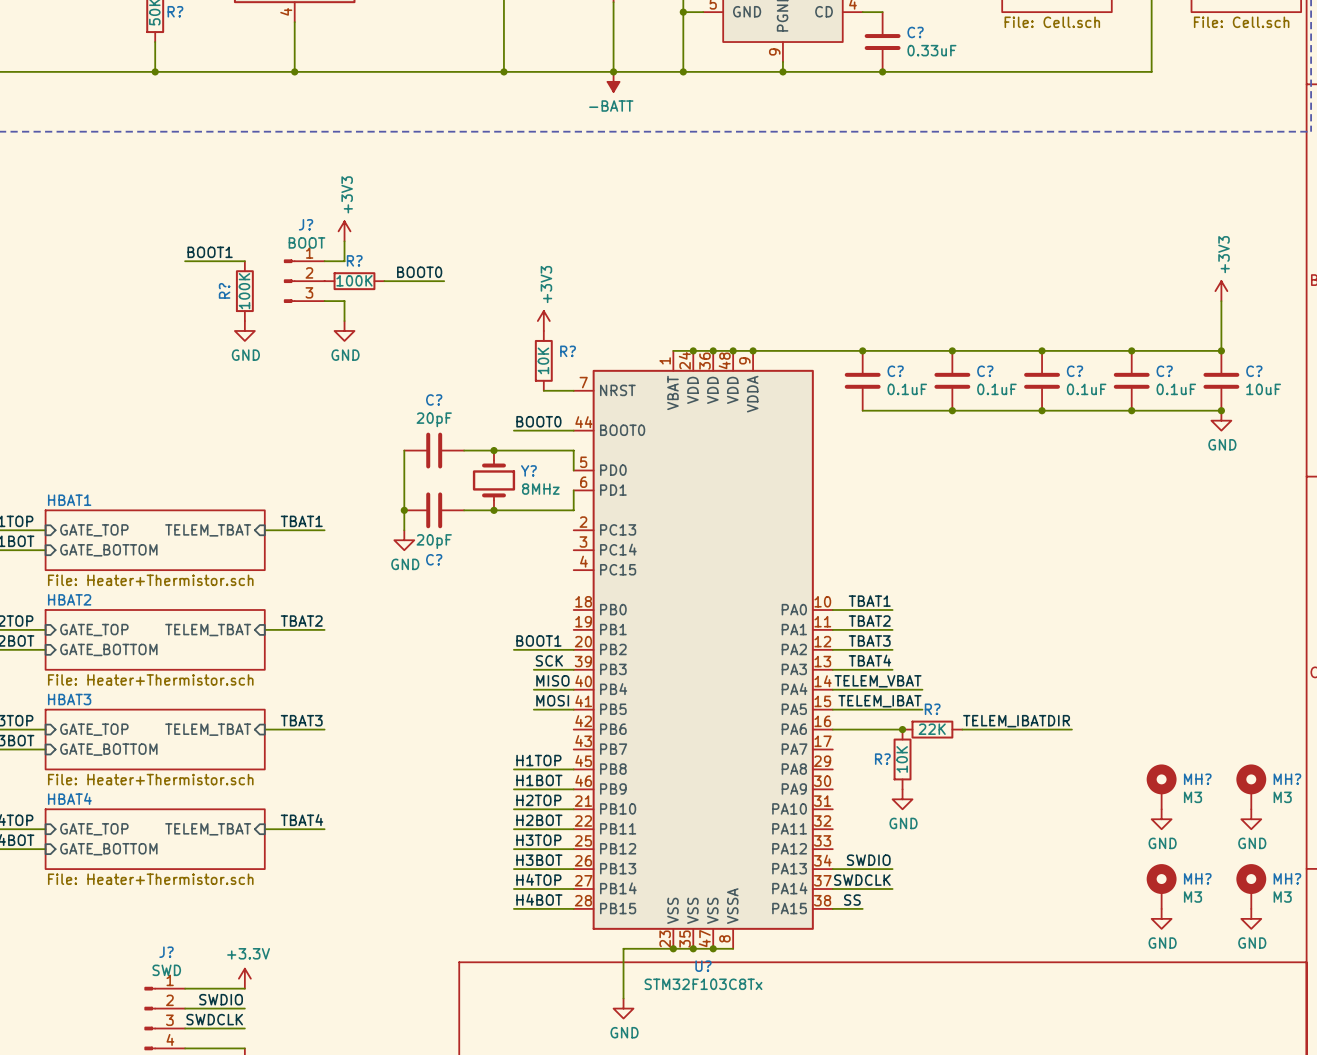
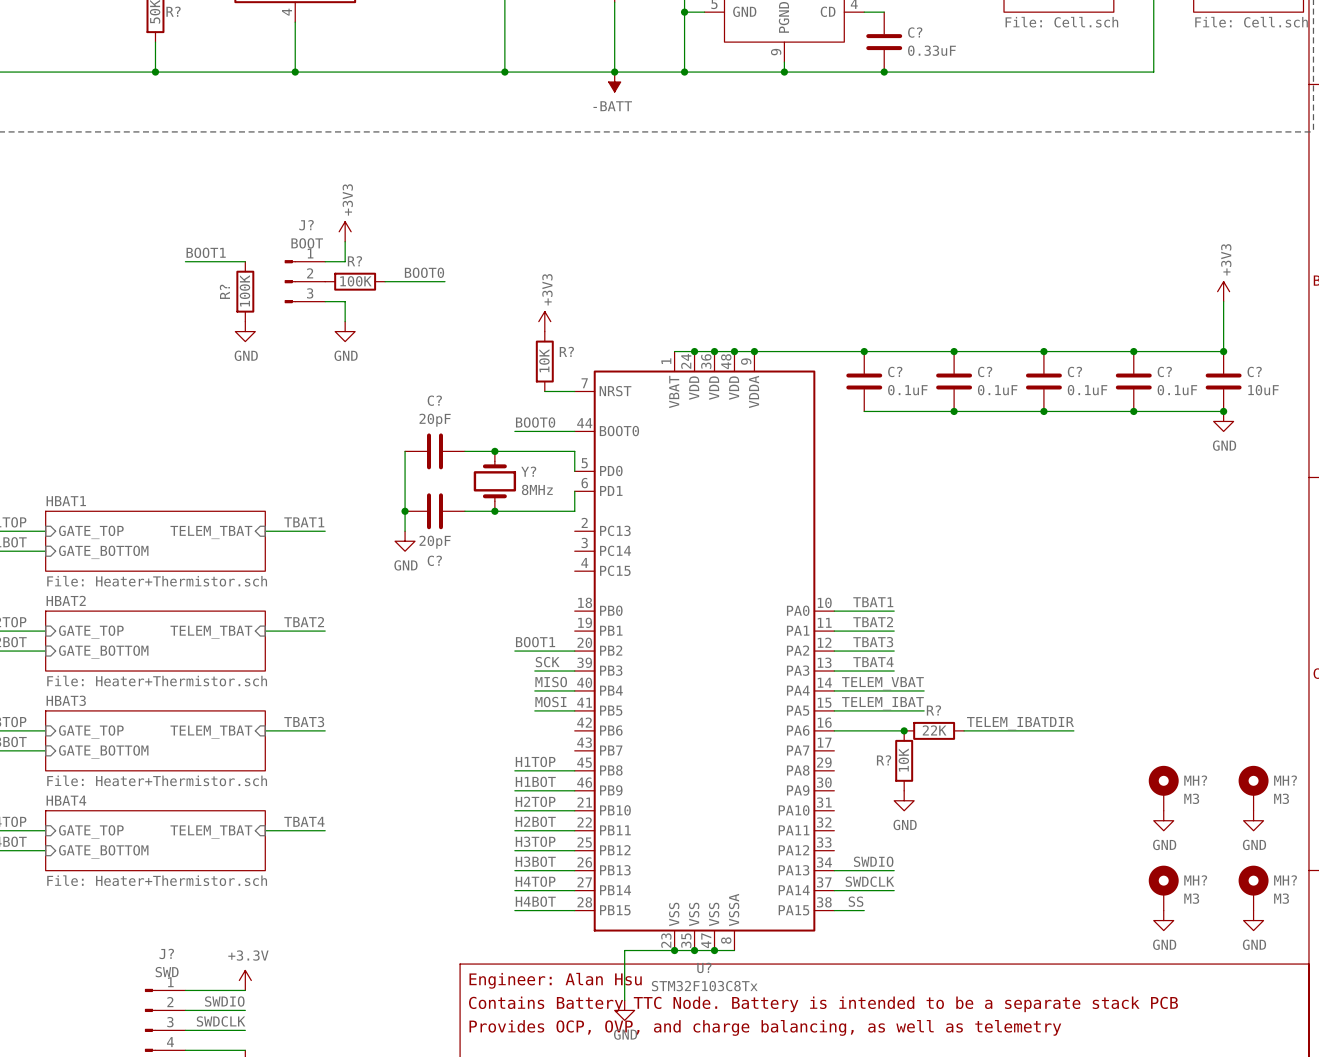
title block: none -> Engineer: Alan Hsu (555, 980)
title block: none -> Contains Battery TTC Node. Battery is intended to be a separate stack PCB (823, 1004)
title block: none -> Provides OCP, OVP, and charge balancing, as well as telemetry (765, 1027)

